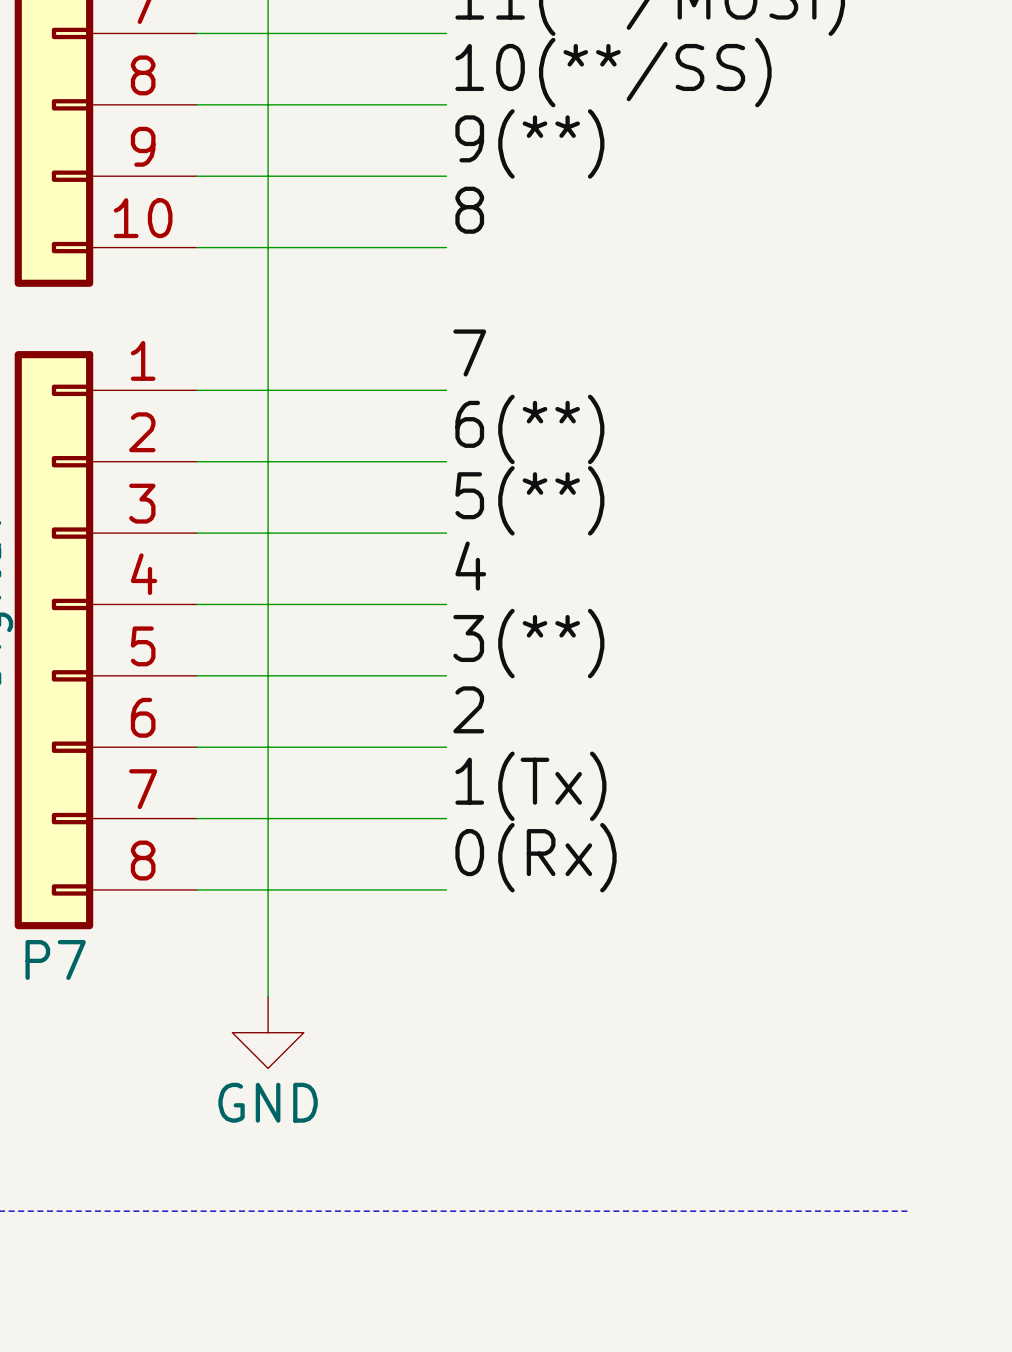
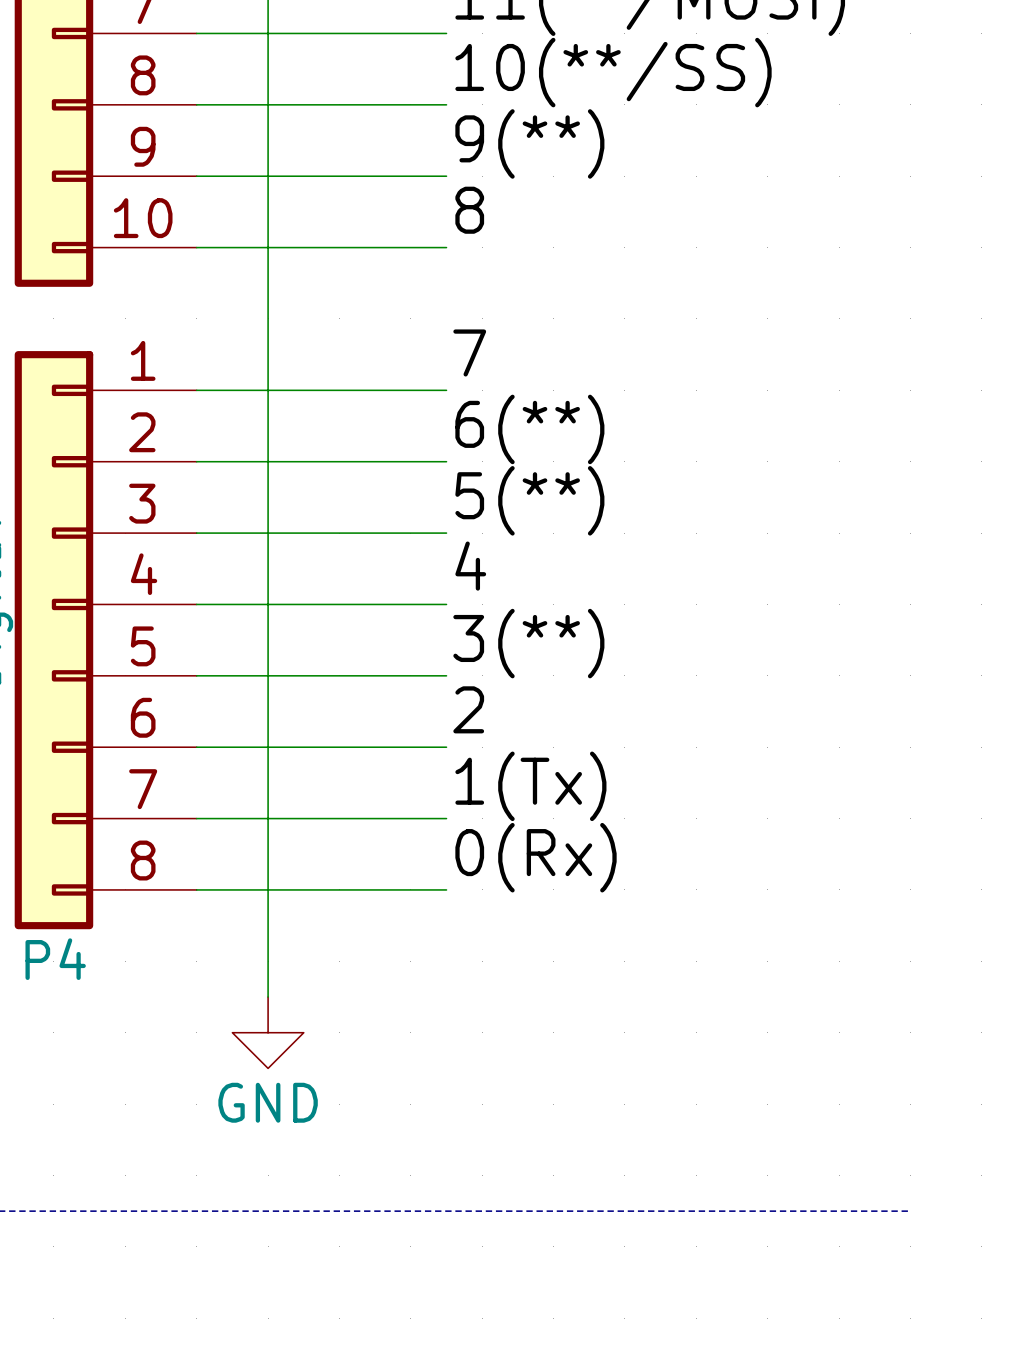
P7 name: P7 (55, 960) -> P4 (55, 959)

